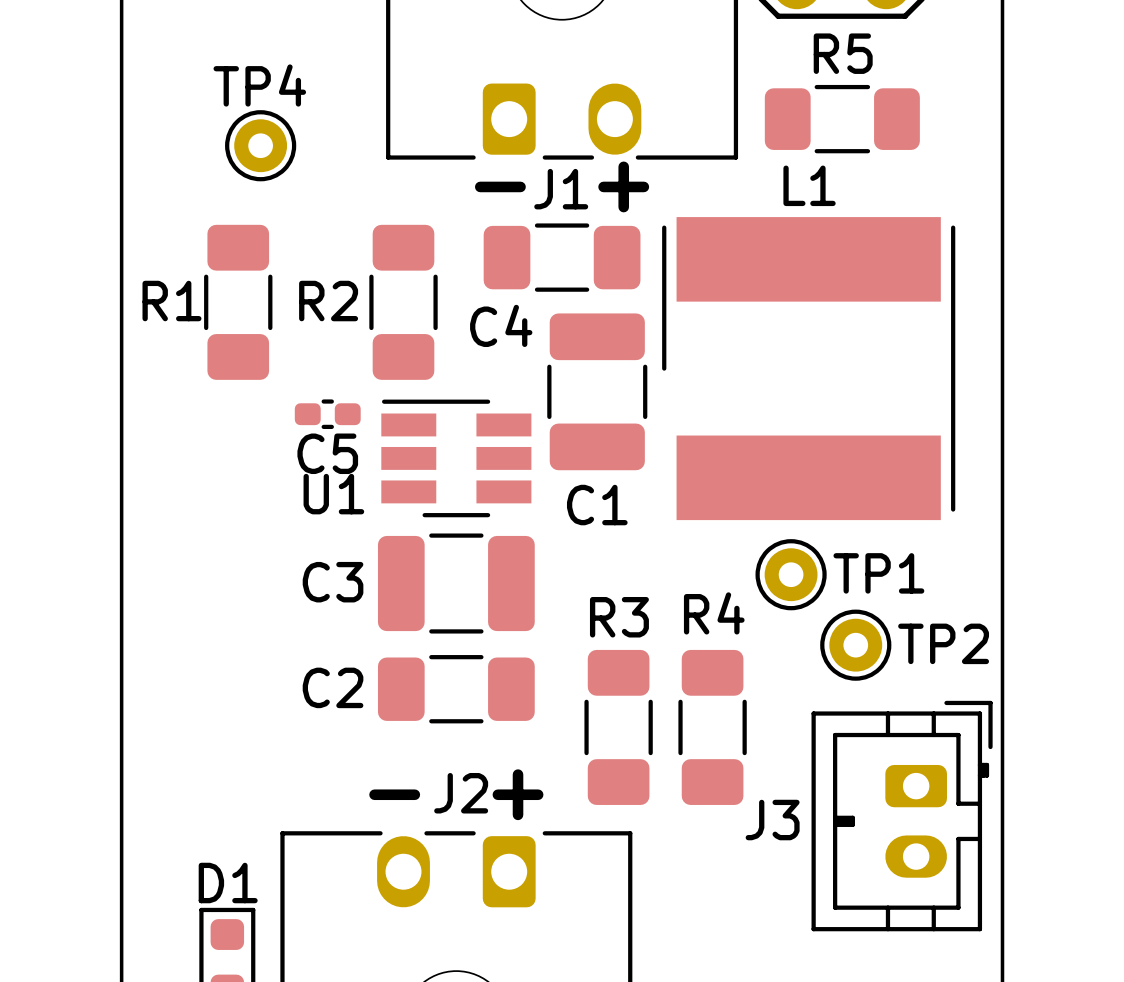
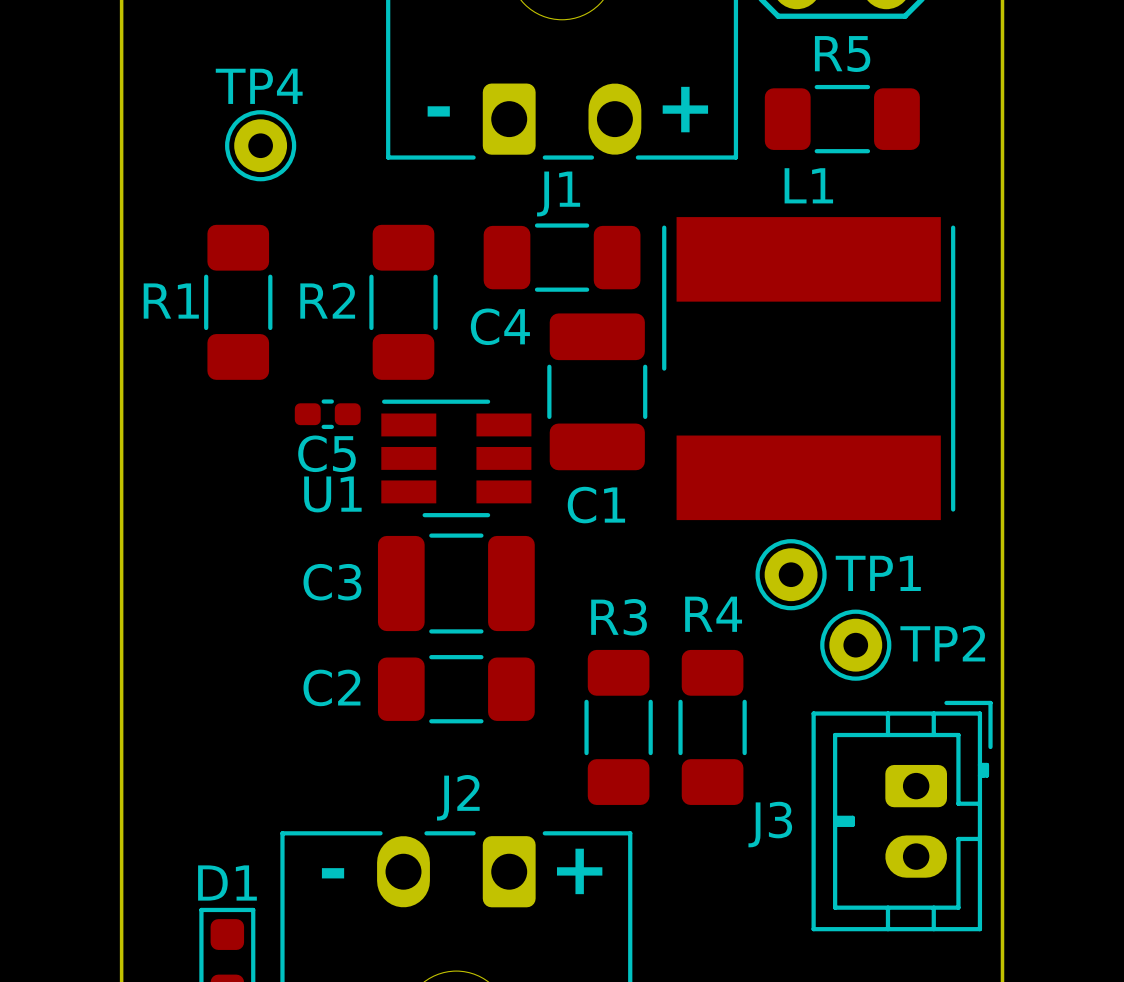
text position: - (500, 186) -> - (438, 111)
text position: + (623, 186) -> + (685, 109)
text position: - (394, 794) -> - (333, 873)
text position: + (518, 794) -> + (579, 871)

